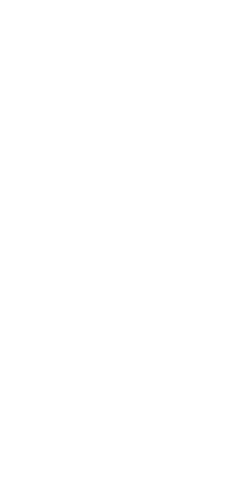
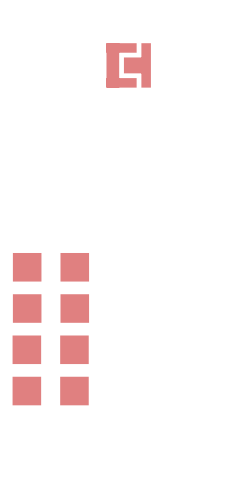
part: none -> (128, 65)
part: none -> (50, 267)
part: none -> (50, 308)
part: none -> (50, 349)
part: none -> (50, 391)

